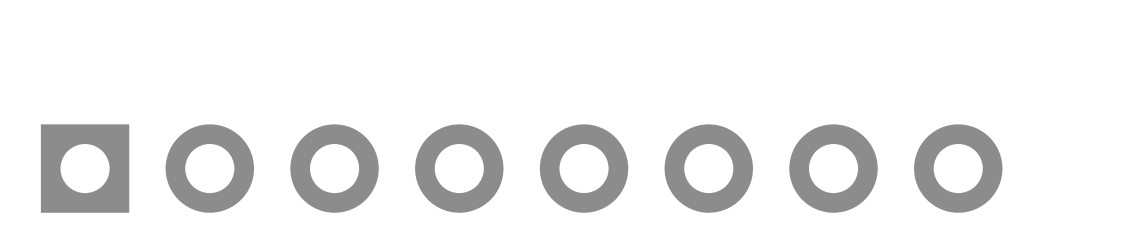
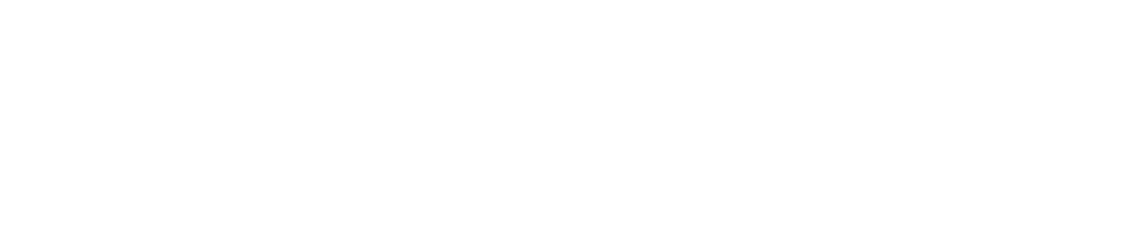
part: (521, 168) -> none

